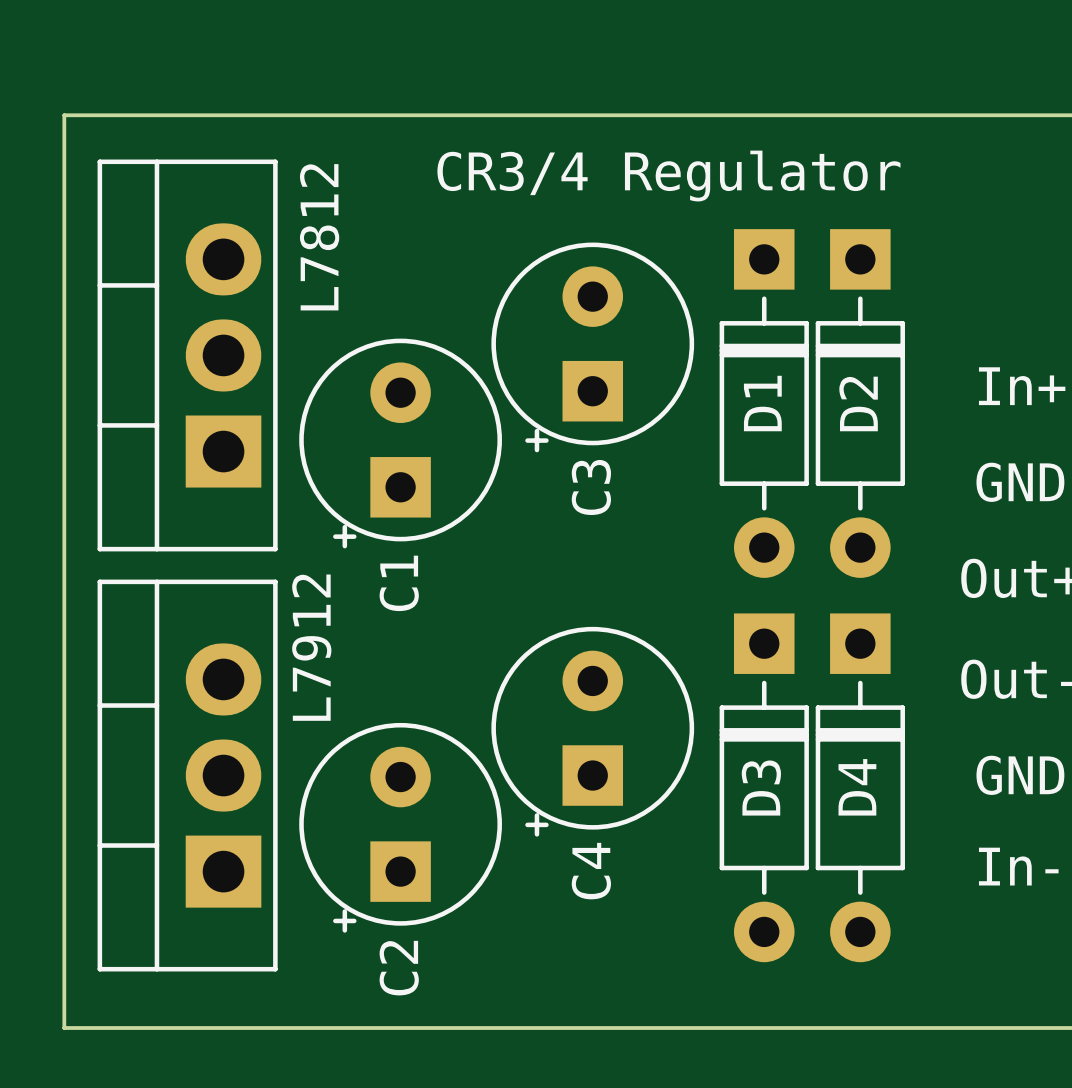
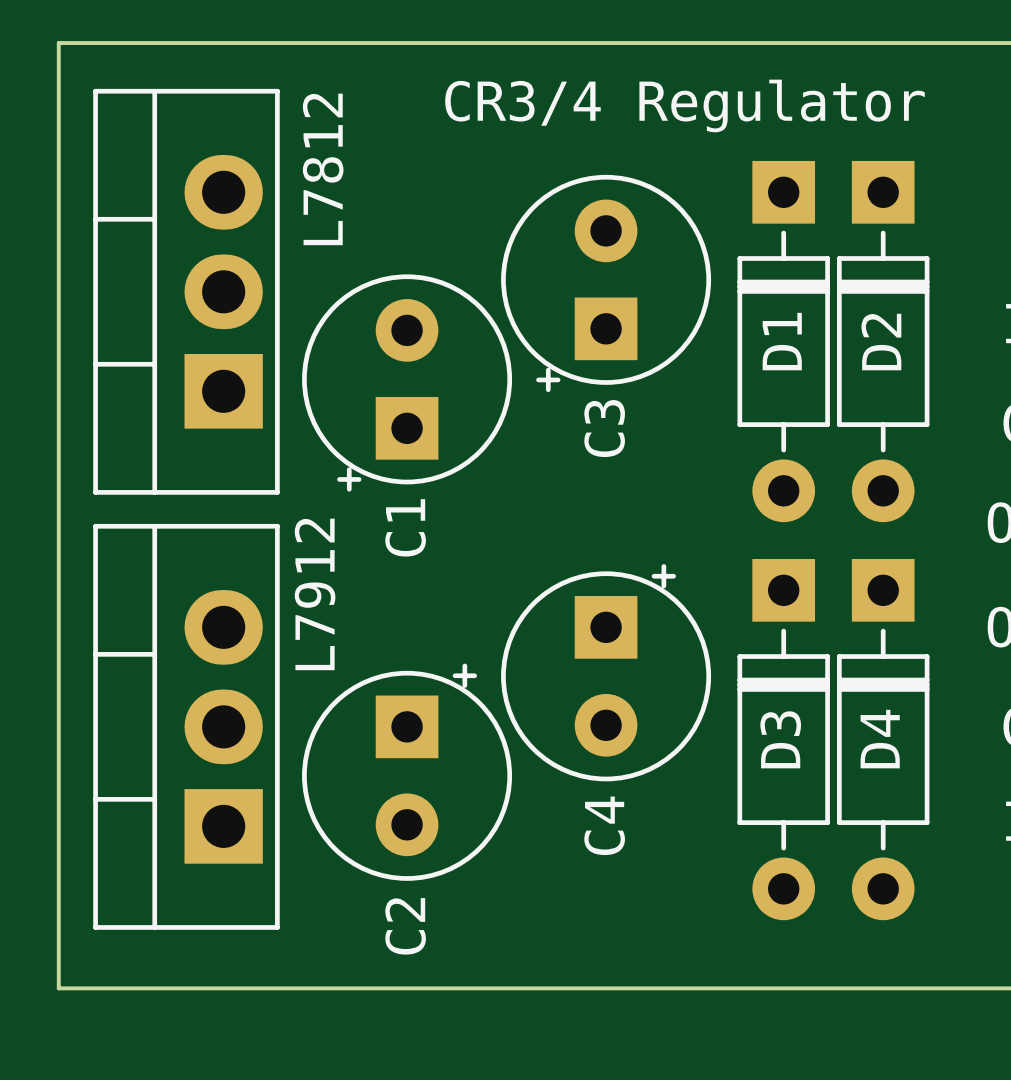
C4 rotation: 0° (592, 731) -> 180° (606, 672)
C2 rotation: 0° (400, 827) -> 180° (407, 772)

